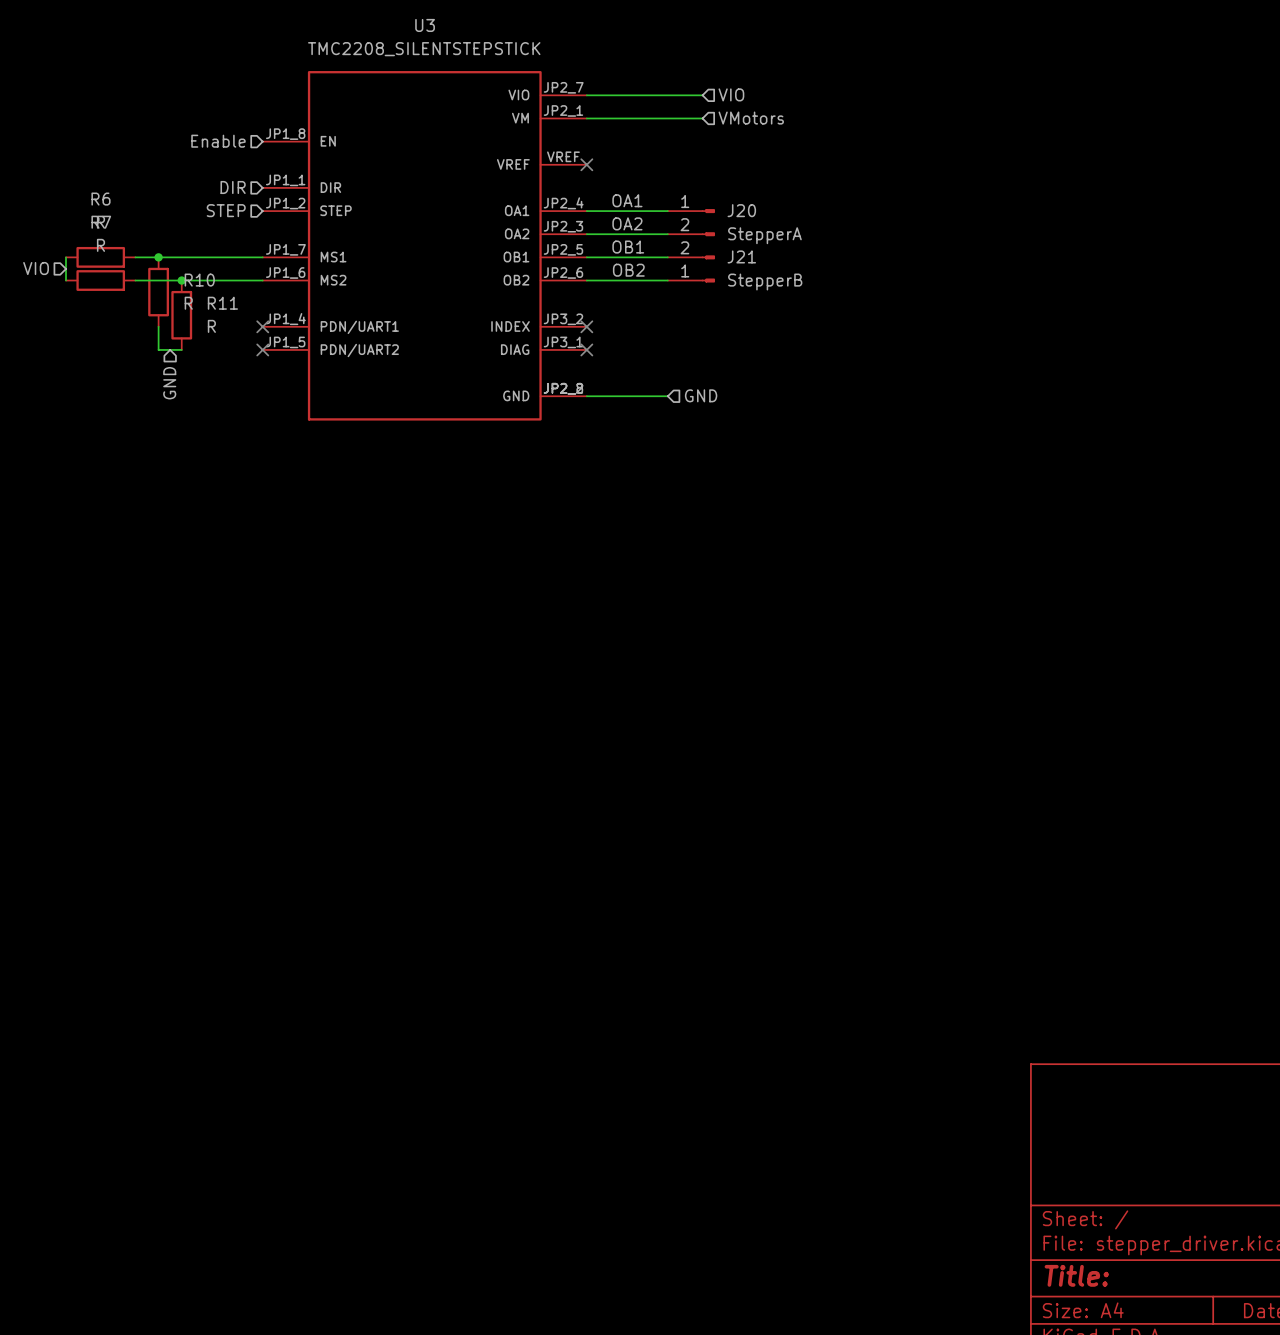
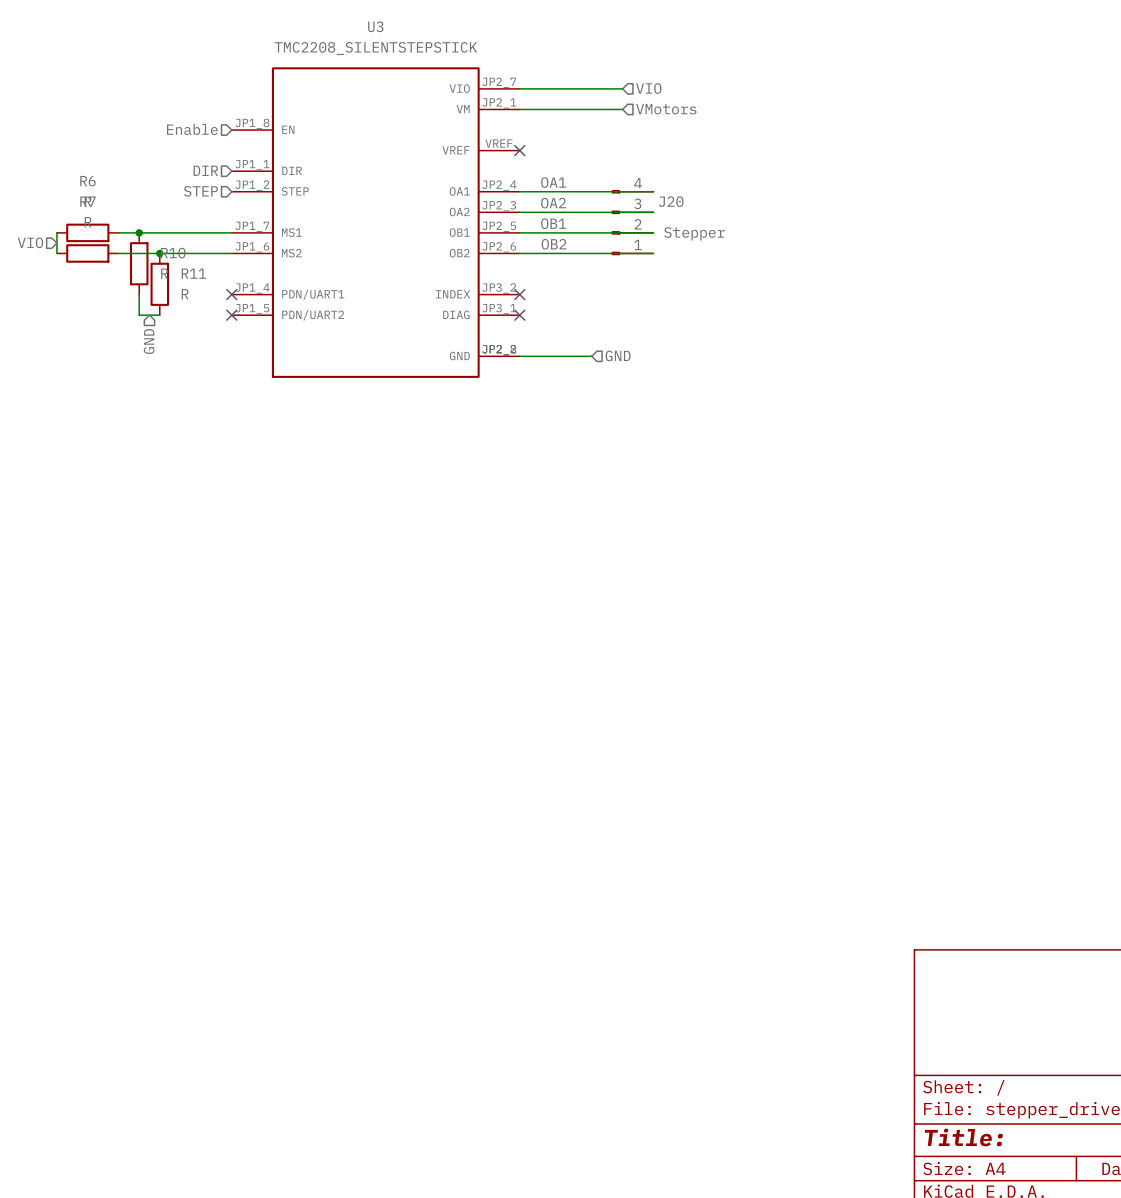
J20 symbol: [667, 209, 715, 237] -> [611, 190, 654, 256]
J20 name position: J20 (741, 210) -> J20 (671, 201)
J20 value: StepperA (764, 235) -> Stepper (694, 233)
J21: StepperB (691, 268) -> none

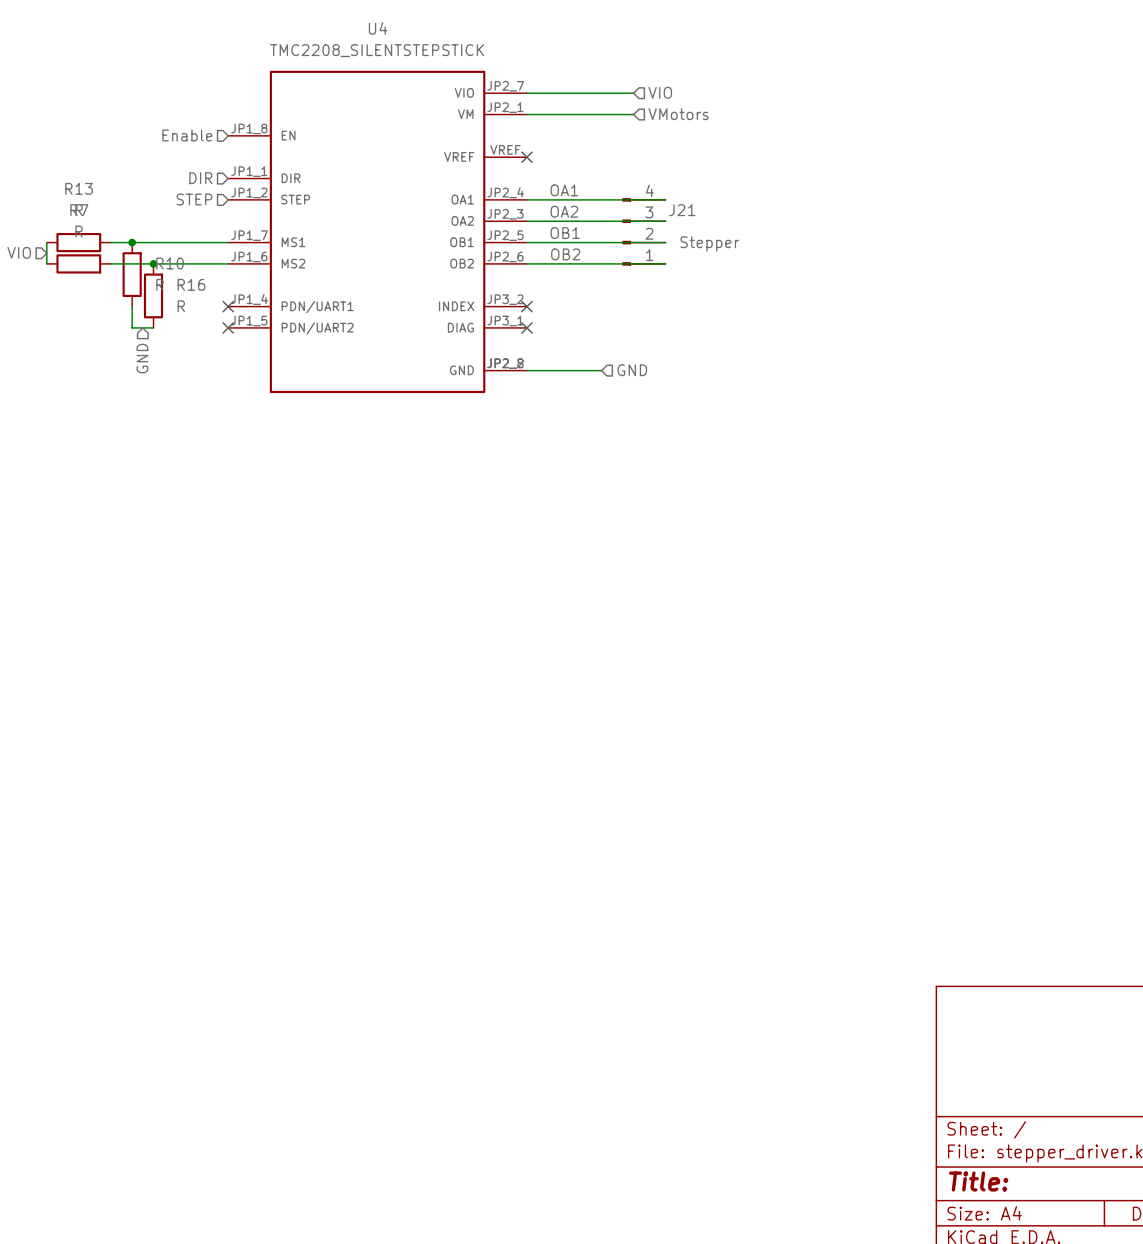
U3 name: U3 (375, 26) -> U4 (378, 28)
R6 name: R6 (87, 181) -> R13 (79, 188)
J20 name: J20 (671, 201) -> J21 (682, 210)
R11 name: R11 (193, 273) -> R16 (191, 284)

